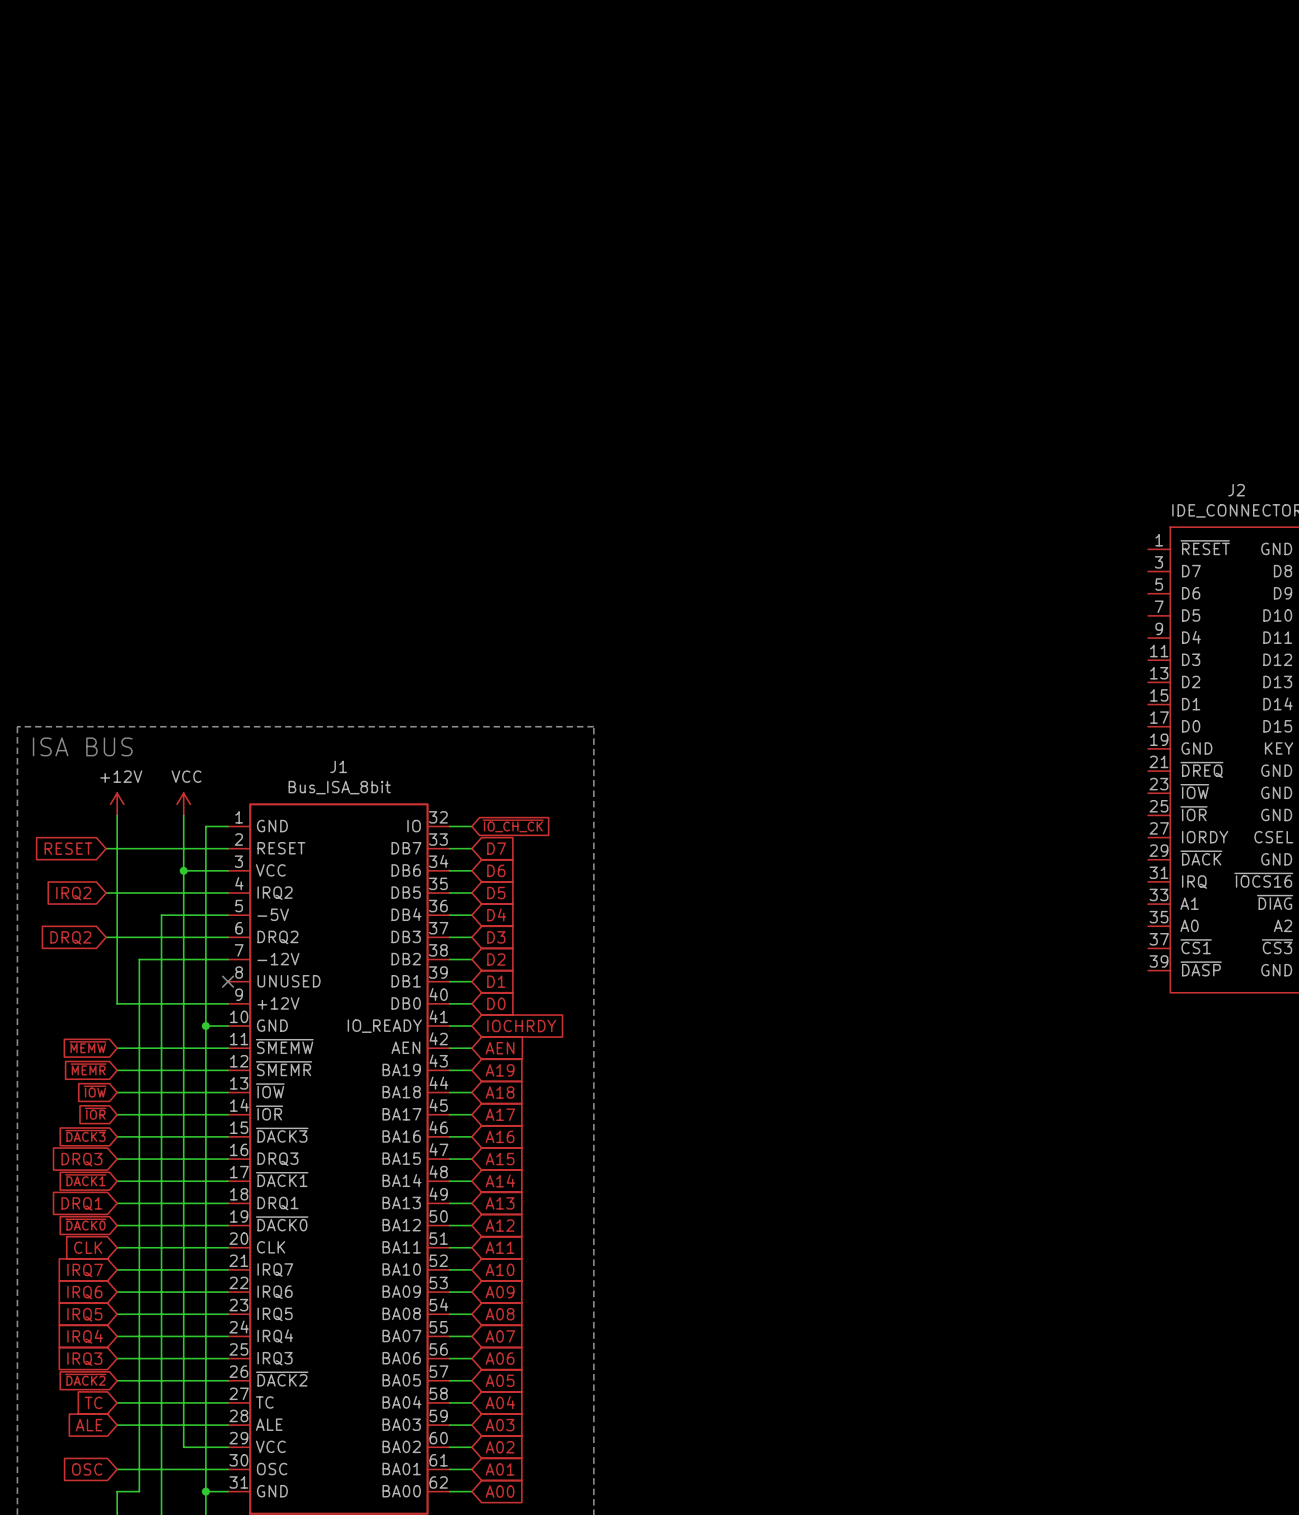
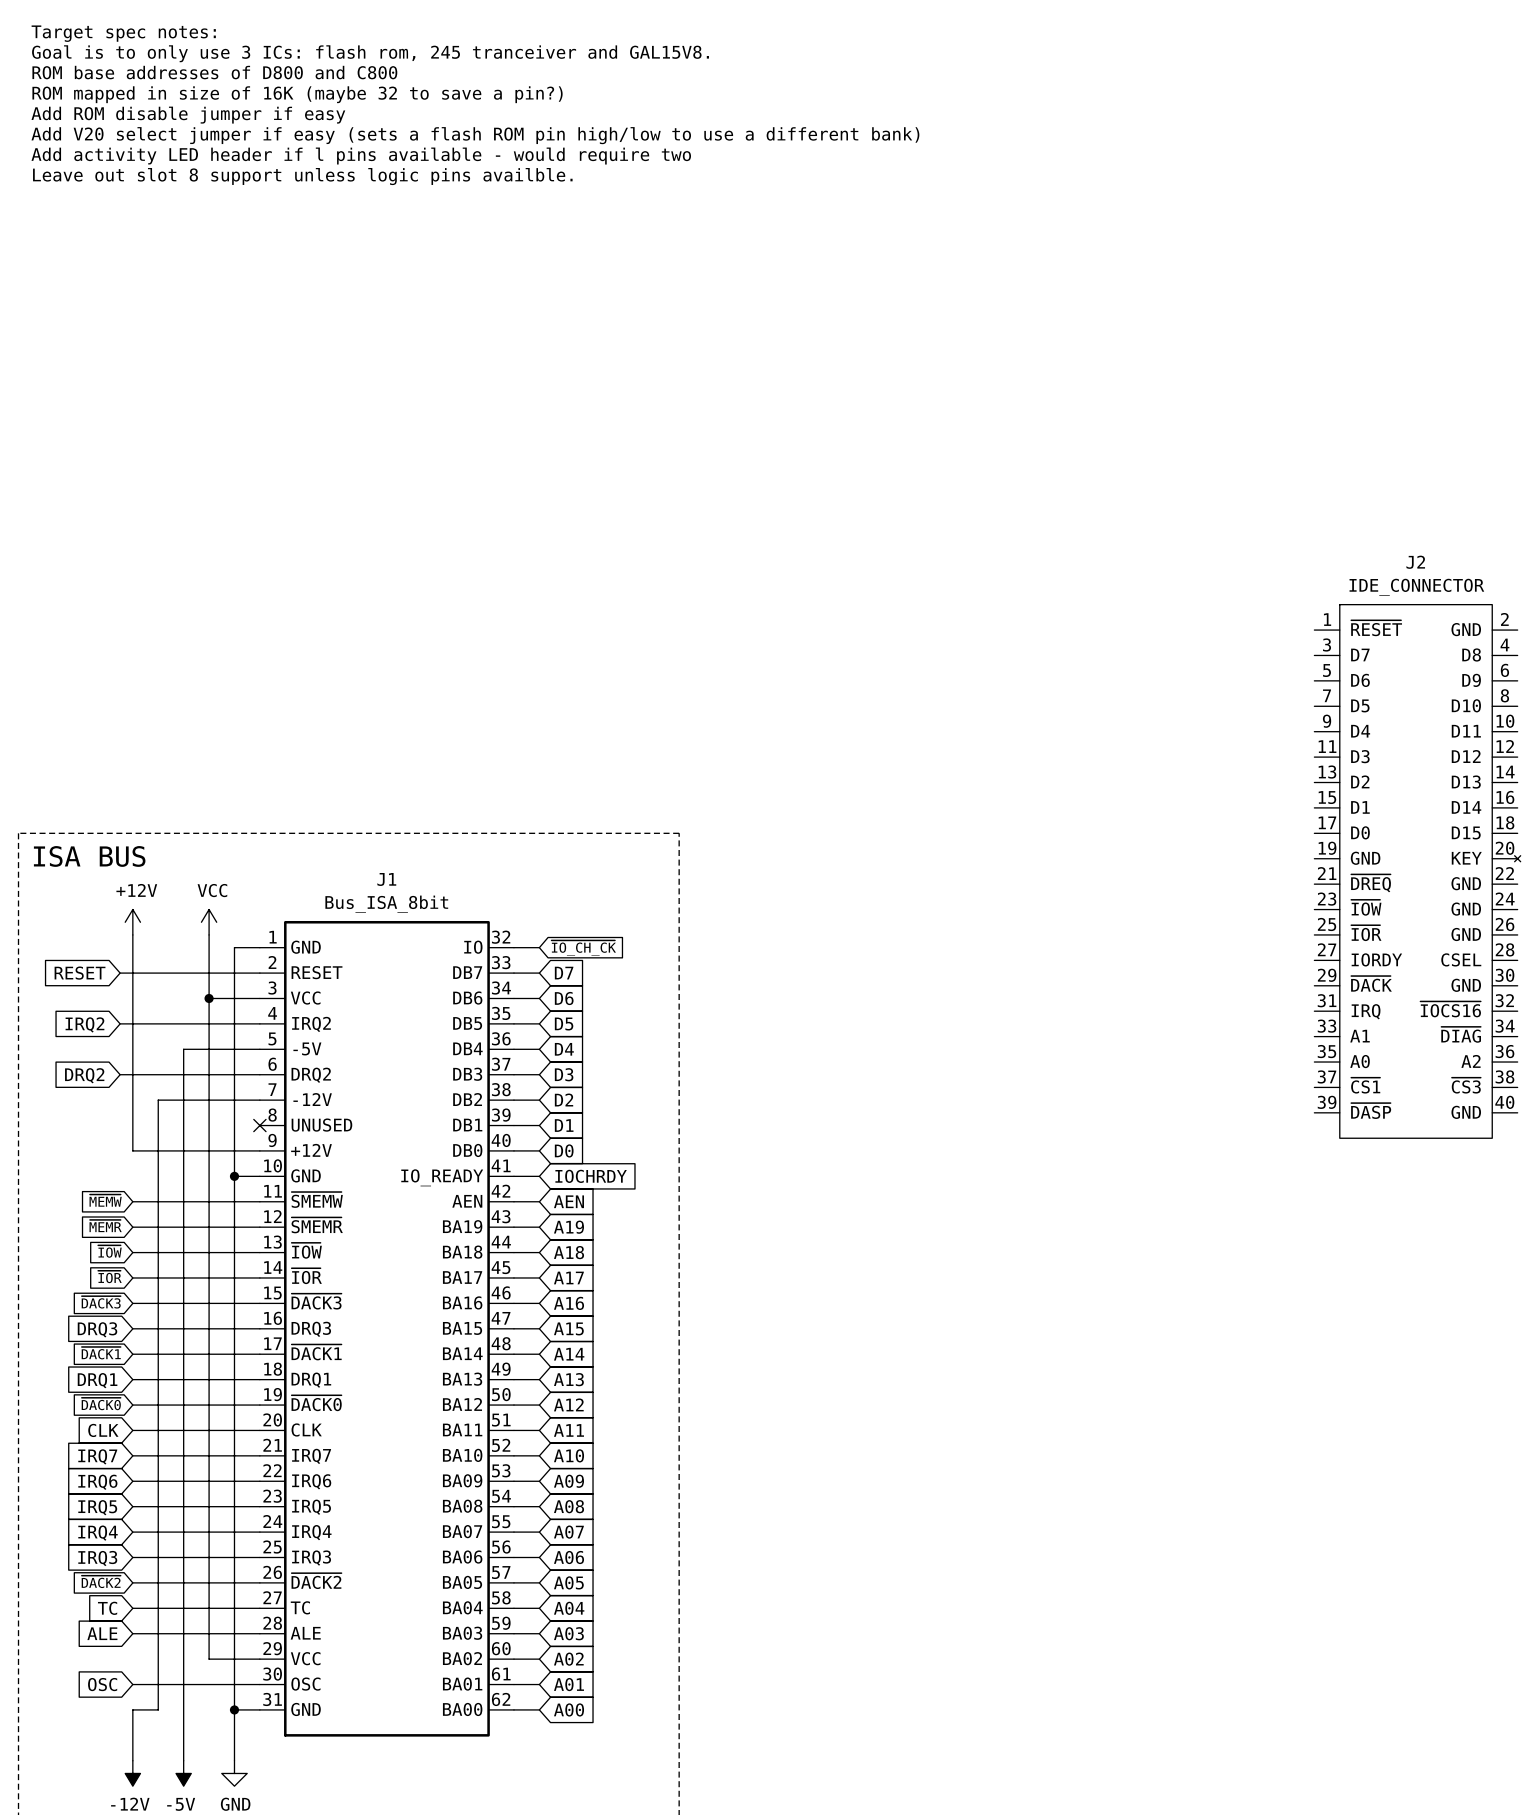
text: none -> Target spec notes: (123, 33)
text: none -> Goal is to only use 3 ICs: flash rom, 245 tranceiver and GAL15V8. (370, 53)
text: none -> ROM base addresses of D800 and C800 (214, 72)
text: none -> ROM mapped in size of 16K (maybe 32 to save a pin?) (297, 94)
text: none -> Add ROM disable jumper if easy (188, 115)
text: none -> Add V20 select jumper if easy (sets a flash ROM pin high/low to use a different bank) (475, 135)
text: none -> Add activity LED header if l pins available - would require two (361, 156)
text: none -> Leave out slot 8 support unless logic pins availble. (302, 176)

